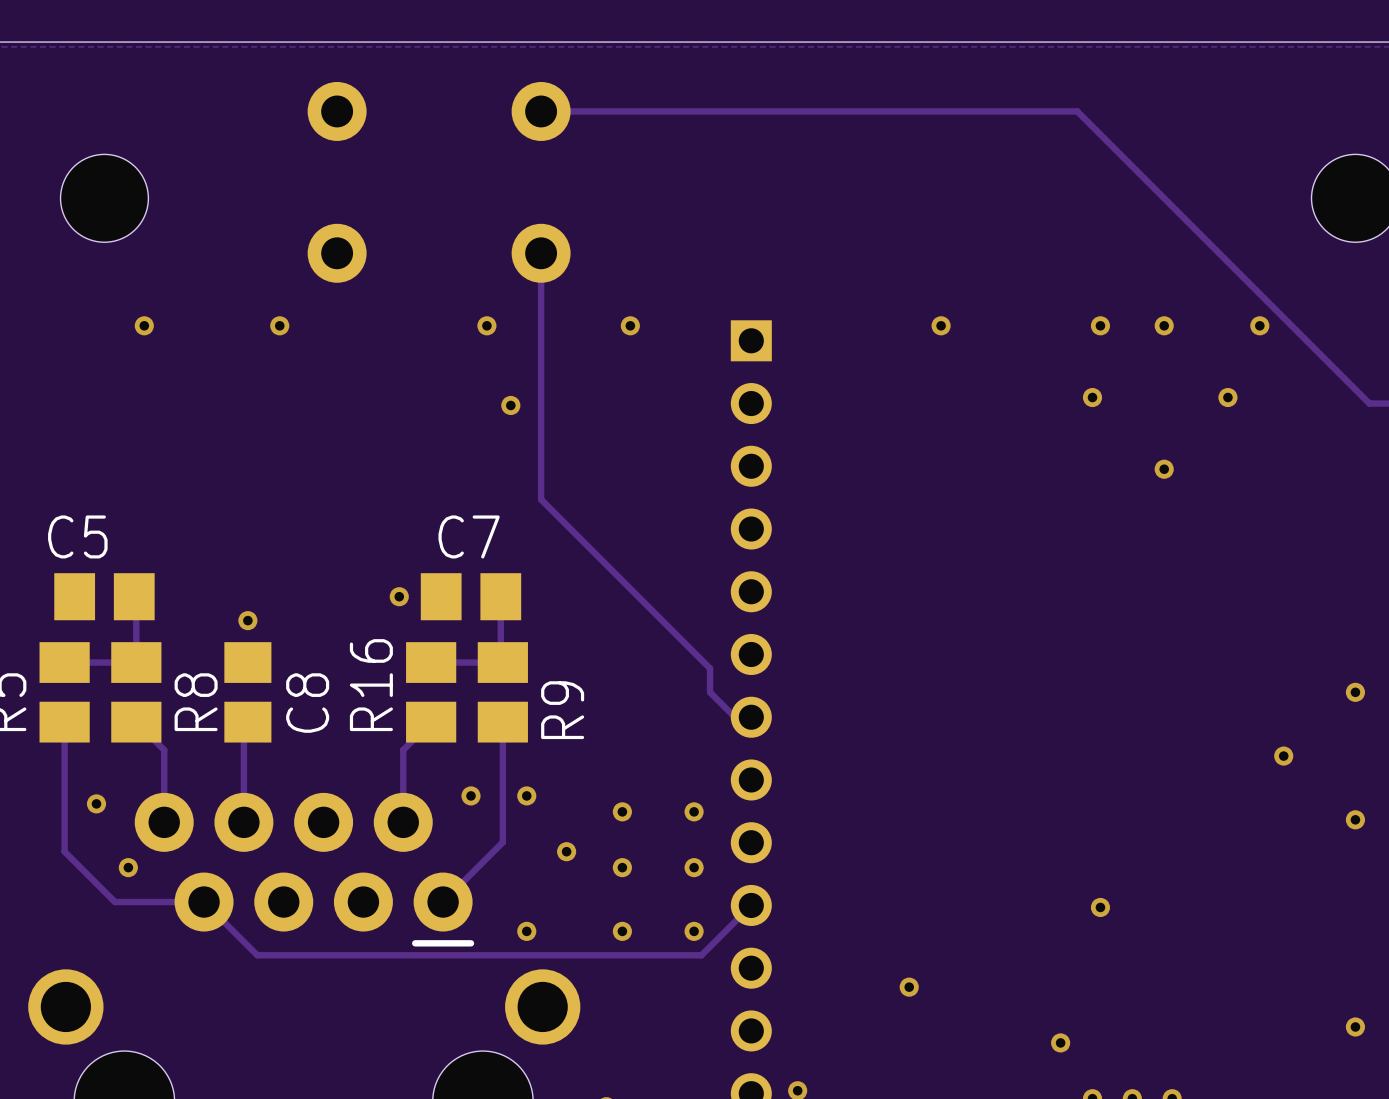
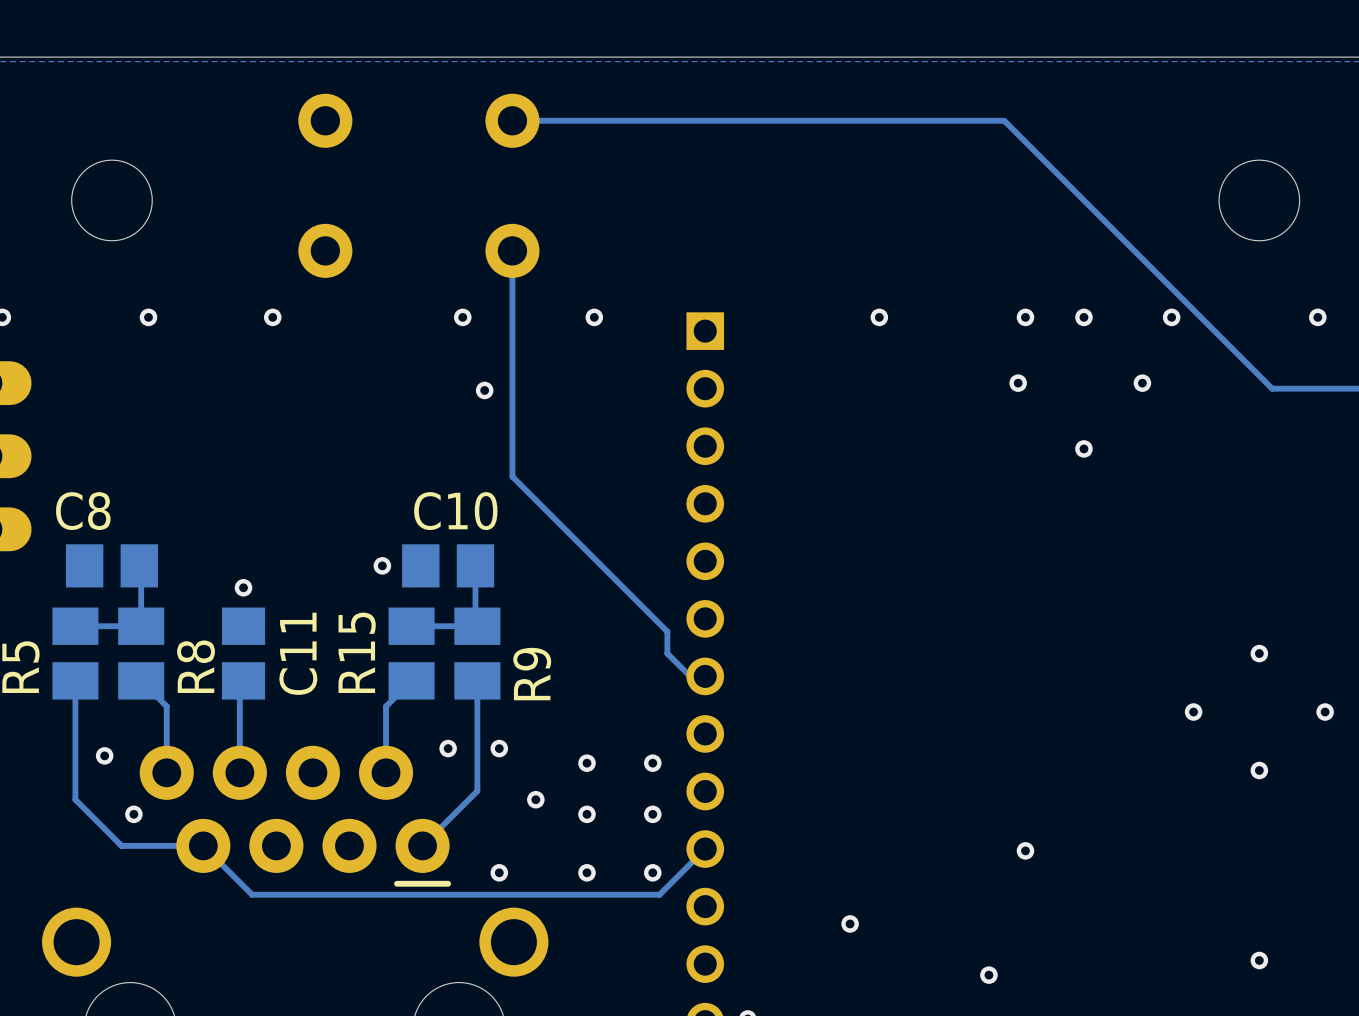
C5 name: C5 (77, 536) -> C8 (83, 511)
C7 name: C7 (469, 536) -> C10 (455, 511)
R16 name: R16 (371, 685) -> R15 (357, 652)
C8 name: C8 (307, 703) -> C11 (298, 653)

